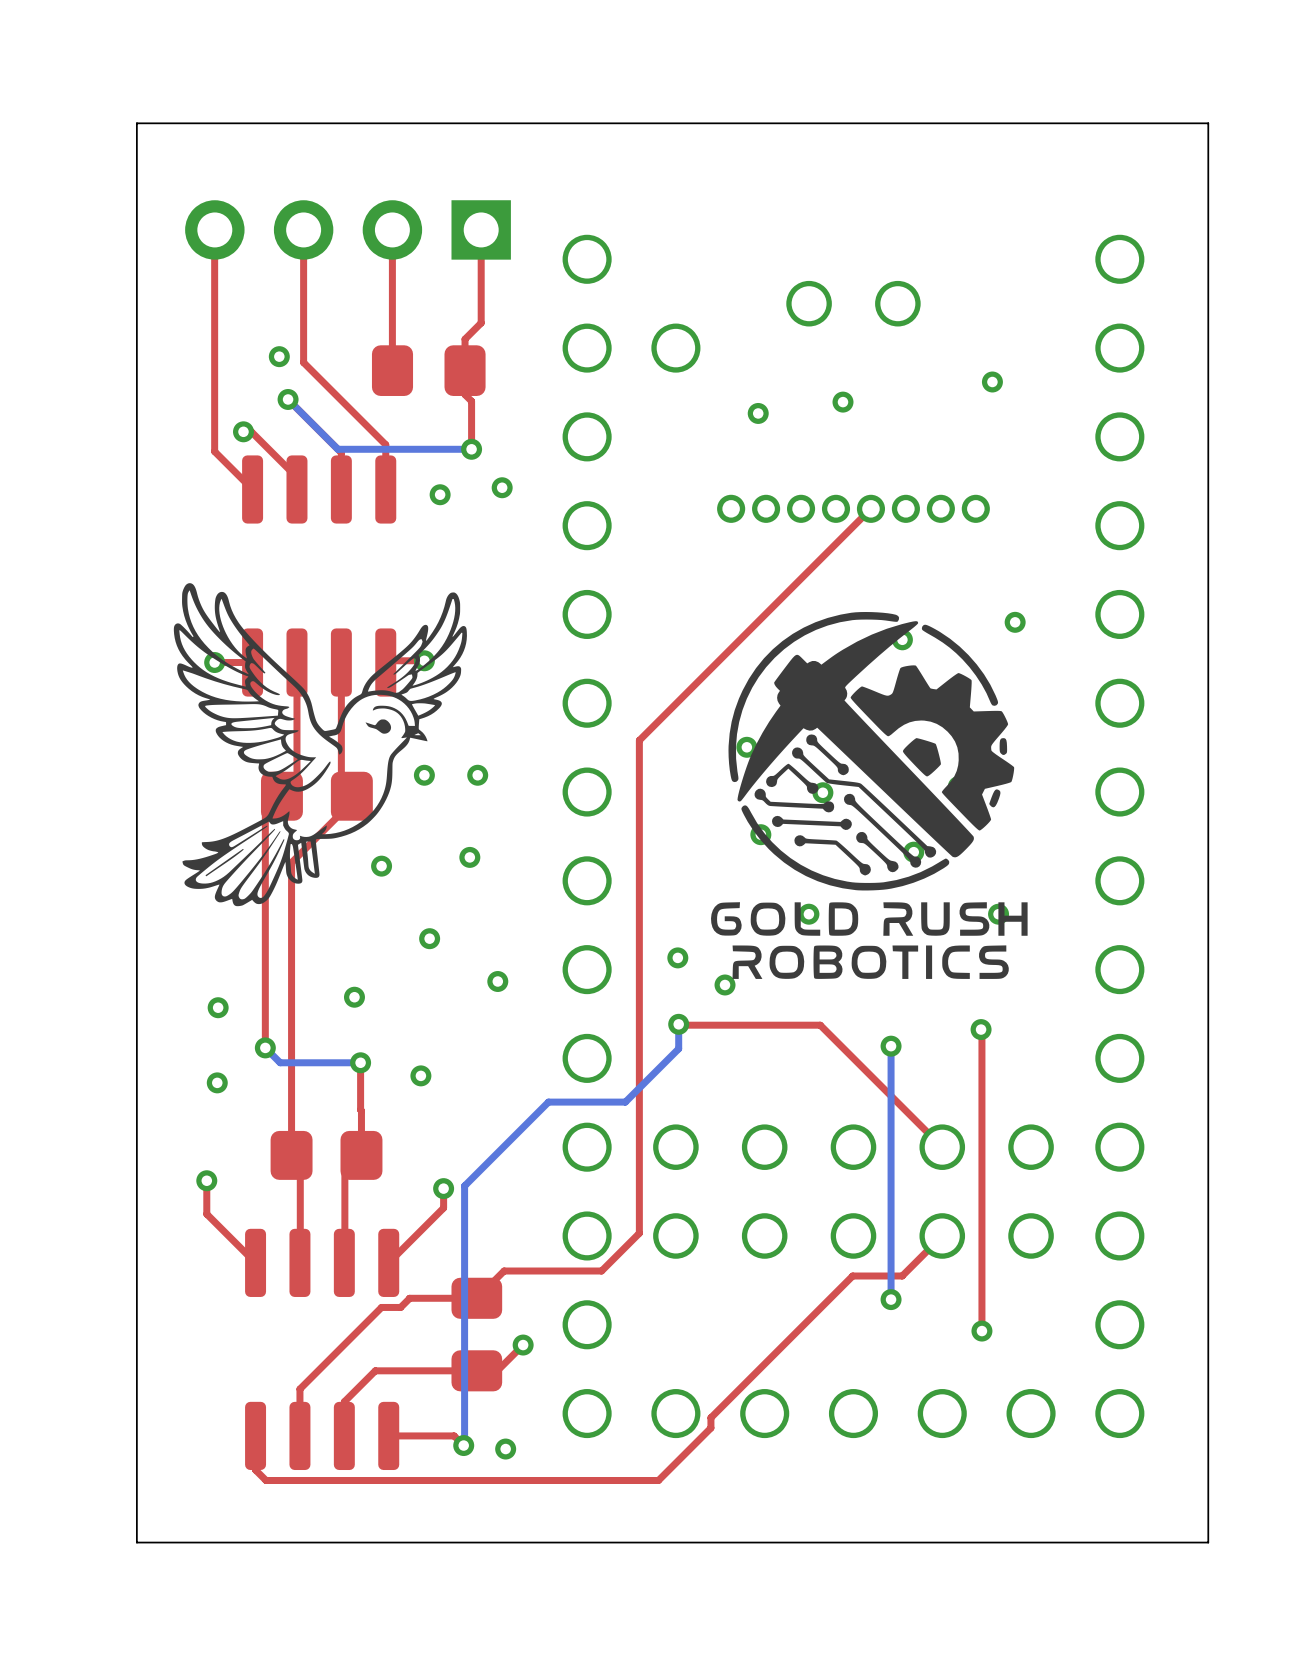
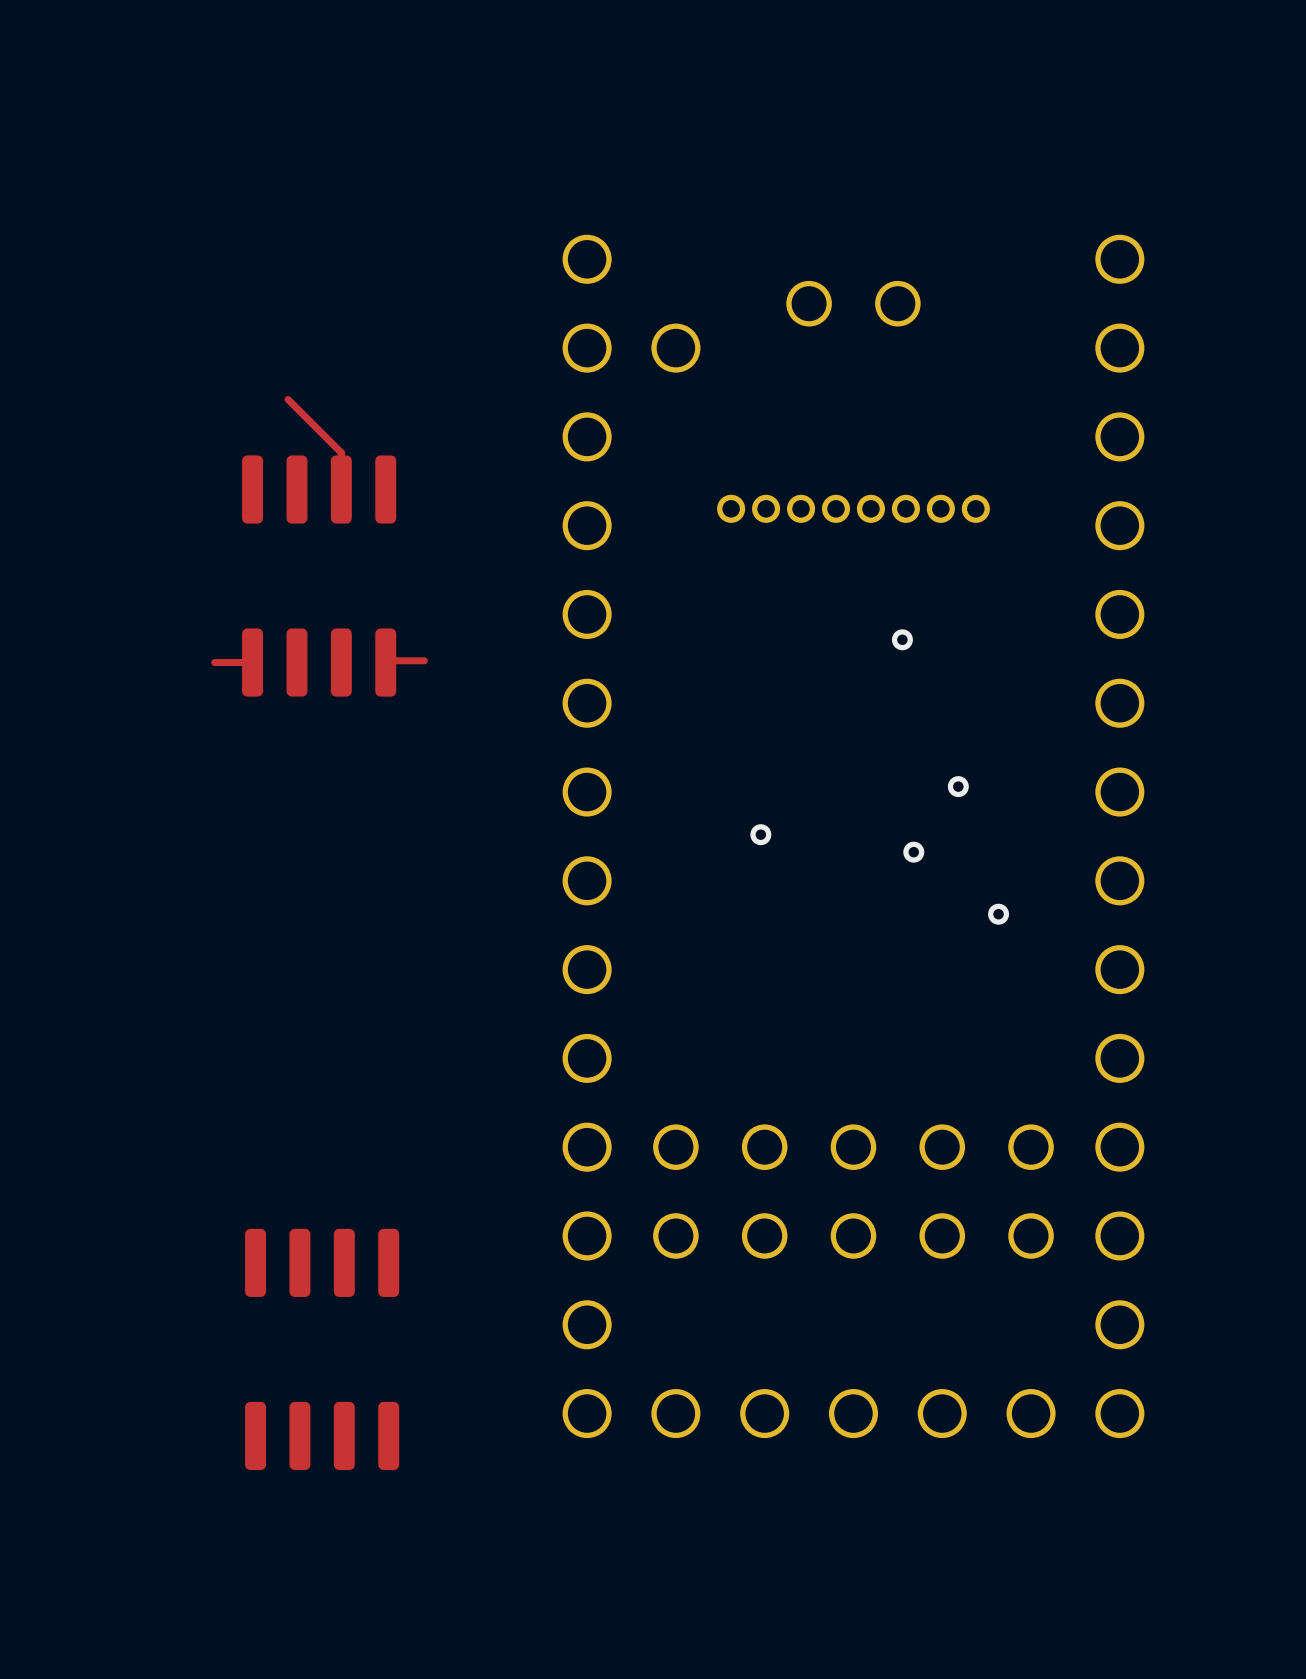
board edge: (1208, 123) (136, 123) (136, 1542) (1208, 1542) (1208, 123) -> none
top track: (303, 229) (303, 362) (385, 444) (385, 489) -> none
part: (348, 229) -> none
top track: (392, 229) (392, 370) -> none
top track: (481, 229) (481, 323) (465, 339) (465, 394) (471, 401) (471, 449) -> none
top track: (214, 230) (214, 451) (252, 489) -> none
via: (279, 356) -> none
part: (428, 370) -> none
via: (992, 382) -> none
bottom track: (288, 399) (337, 449) (471, 449) -> none
via: (288, 399) -> none
via: (842, 402) -> none
via: (758, 413) -> none
top track: (243, 431) (251, 431) (296, 477) (296, 489) -> none
via: (243, 431) -> none
via: (471, 449) -> none
via: (502, 487) -> none
via: (440, 494) -> none
top track: (870, 508) (639, 740) (639, 1233) (601, 1271) (504, 1271) (476, 1298) (409, 1298) -> none
drawing: [173, 583, 467, 907] -> none
drawing: [711, 611, 1028, 979] -> none
via: (1015, 622) -> none
via: (424, 660) -> none
via: (214, 662) -> none
top track: (296, 662) (296, 781) (265, 812) (265, 1047) -> none
top track: (341, 662) (341, 785) (351, 796) (351, 802) (291, 862) (291, 1155) (300, 1164) (300, 1262) -> none
via: (746, 747) -> none
via: (424, 775) -> none
via: (477, 775) -> none
via: (822, 792) -> none
part: (316, 796) -> none
via: (469, 857) -> none
via: (381, 866) -> none
via: (808, 914) -> none
via: (429, 938) -> none
via: (677, 957) -> none
via: (497, 981) -> none
via: (725, 984) -> none
via: (354, 997) -> none
via: (218, 1007) -> none
top track: (678, 1024) (820, 1025) (942, 1147) -> none
bottom track: (678, 1024) (678, 1048) (625, 1102) (548, 1102) (464, 1185) (463, 1445) -> none
via: (678, 1024) -> none
top track: (981, 1029) (981, 1331) -> none
via: (981, 1029) -> none
bottom track: (891, 1046) (891, 1299) -> none
via: (891, 1046) -> none
bottom track: (265, 1047) (280, 1062) (360, 1062) -> none
via: (265, 1047) -> none
top track: (360, 1062) (361, 1155) (344, 1172) (344, 1262) -> none
via: (360, 1062) -> none
via: (420, 1075) -> none
via: (217, 1082) -> none
part: (326, 1155) -> none
top track: (206, 1180) (206, 1214) (255, 1262) -> none
via: (206, 1180) -> none
top track: (443, 1188) (443, 1208) (388, 1262) -> none
via: (443, 1188) -> none
top track: (942, 1235) (902, 1276) (852, 1276) (710, 1417) (710, 1428) (658, 1480) (266, 1480) (255, 1470) (255, 1435) -> none
top track: (409, 1298) (400, 1307) (381, 1307) (299, 1389) (299, 1435) -> none
via: (891, 1299) -> none
via: (981, 1331) -> none
part: (476, 1334) -> none
top track: (523, 1345) (497, 1370) (375, 1370) (344, 1401) (344, 1435) -> none
via: (523, 1345) -> none
top track: (388, 1435) (454, 1435) (463, 1445) -> none
via: (463, 1445) -> none
via: (505, 1449) -> none

